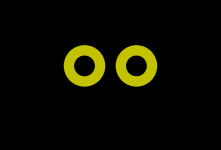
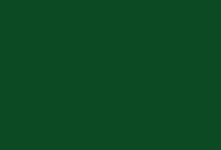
part: (110, 65) -> none

